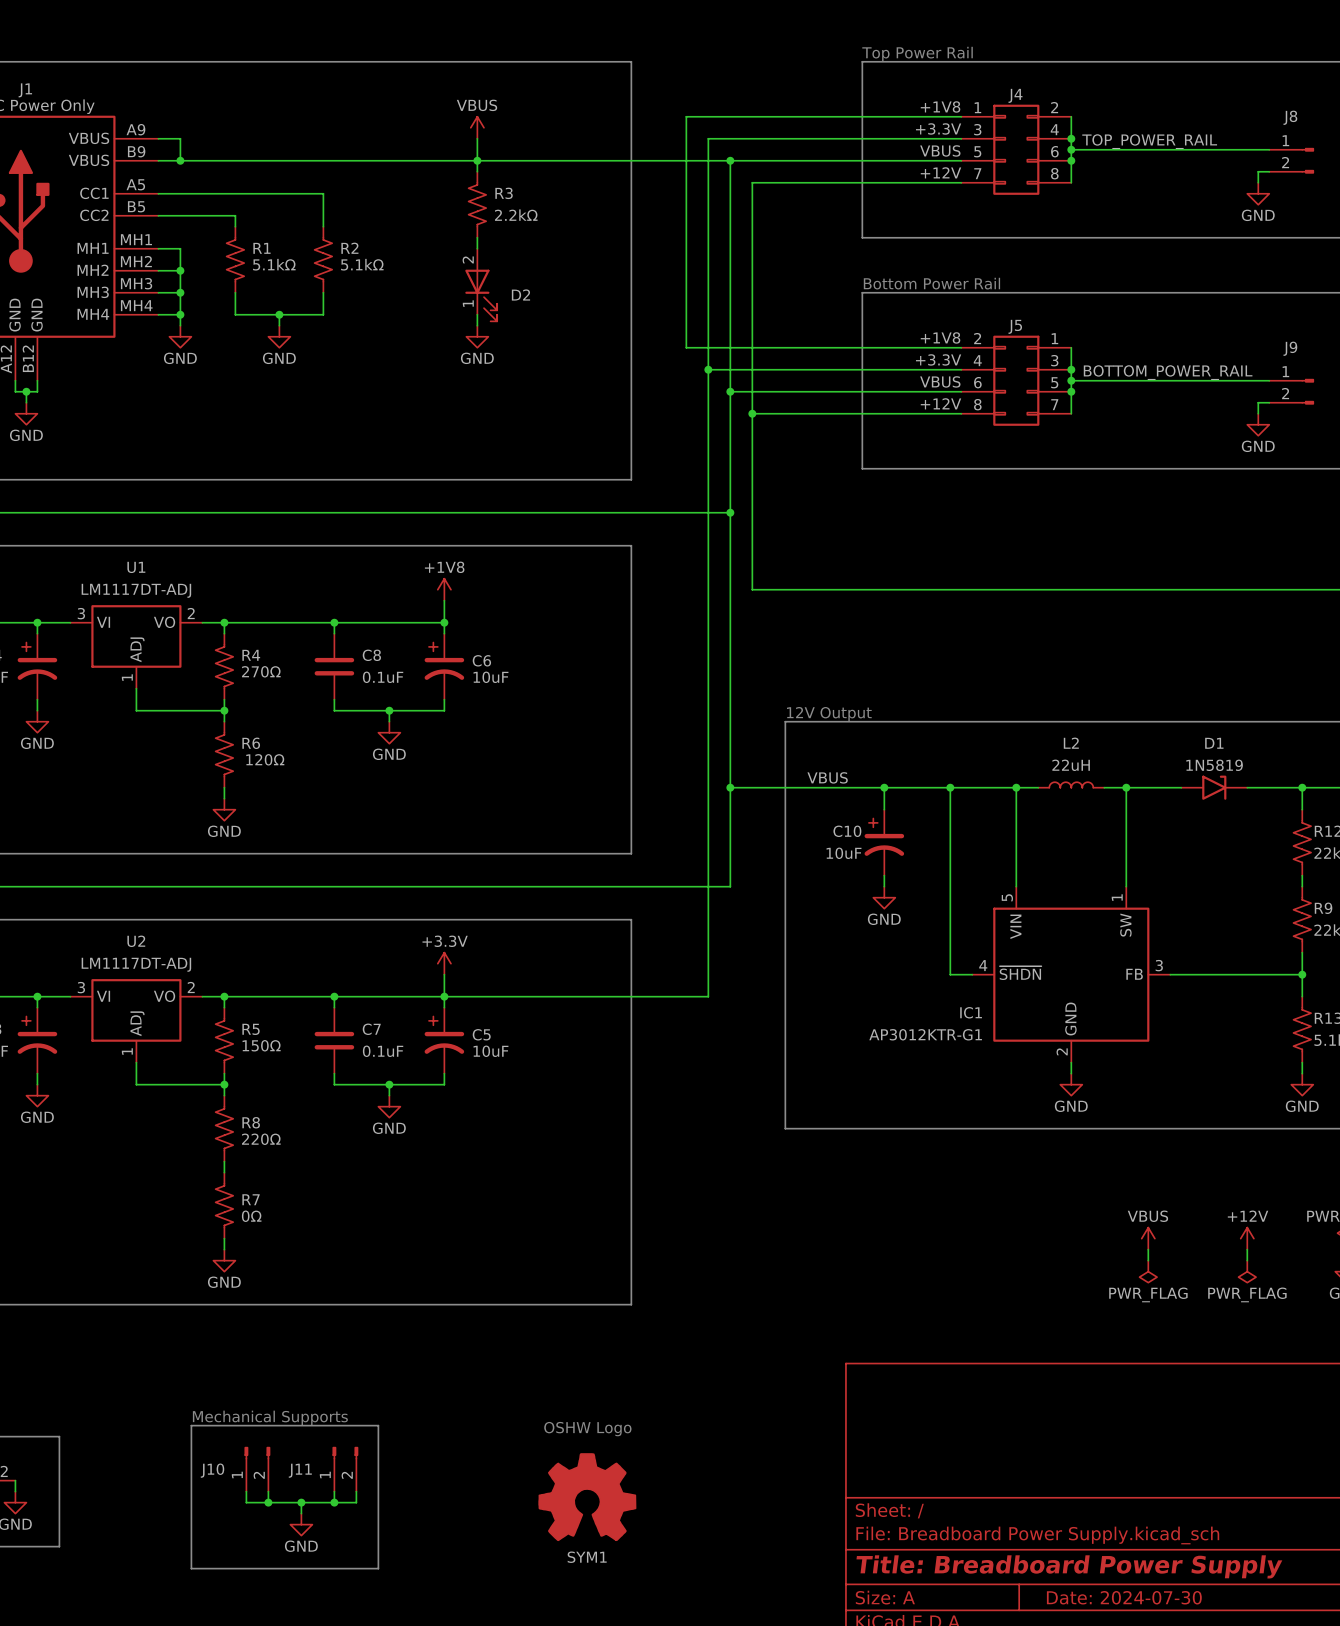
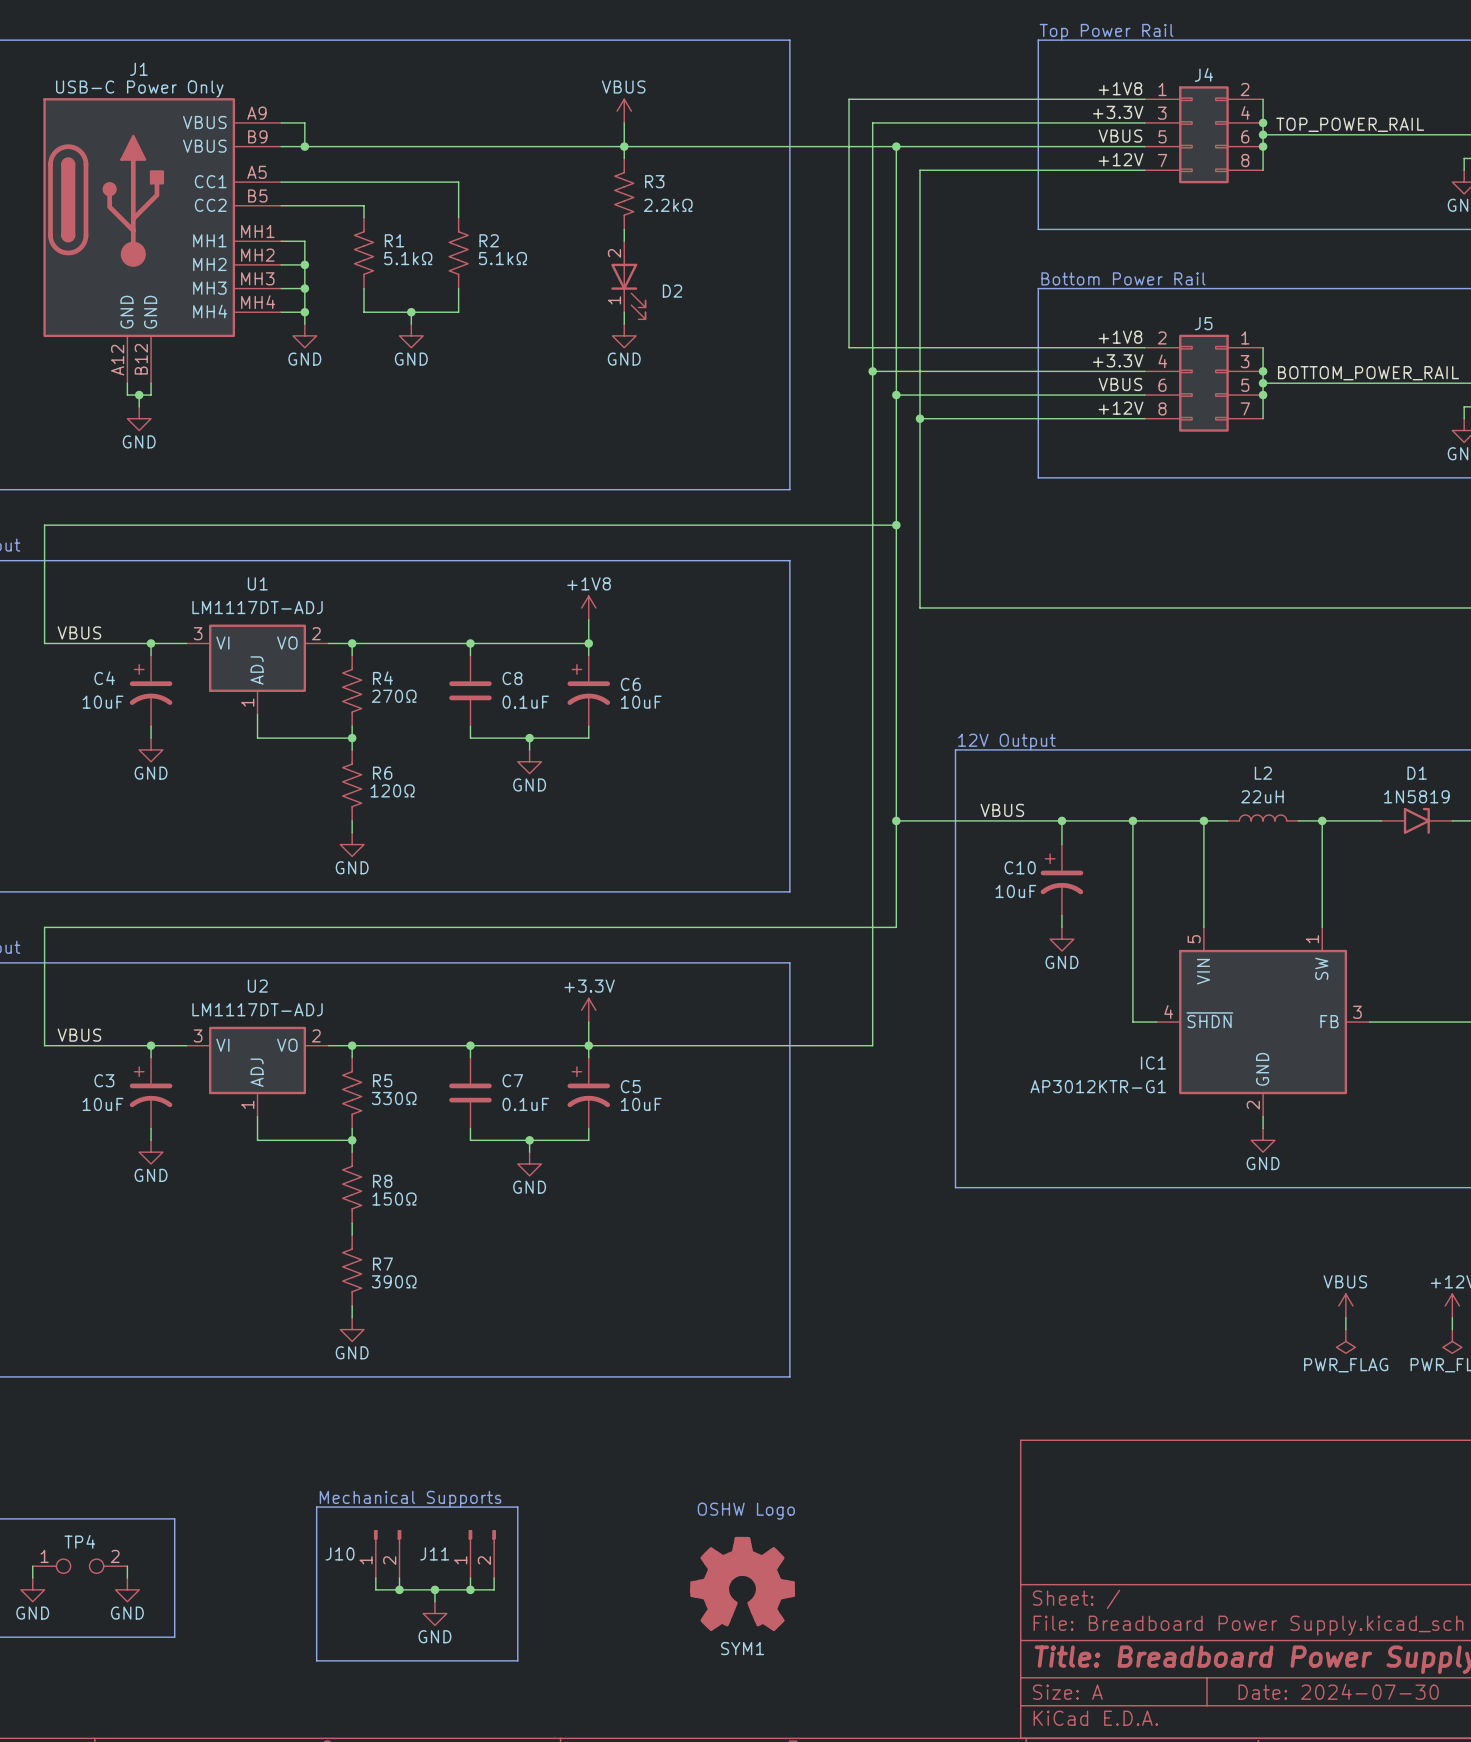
R5 value: 150Ω (261, 1045) -> 330Ω (394, 1098)
R8 value: 220Ω (261, 1139) -> 150Ω (394, 1199)
R7 value: 0Ω (251, 1216) -> 390Ω (394, 1281)

